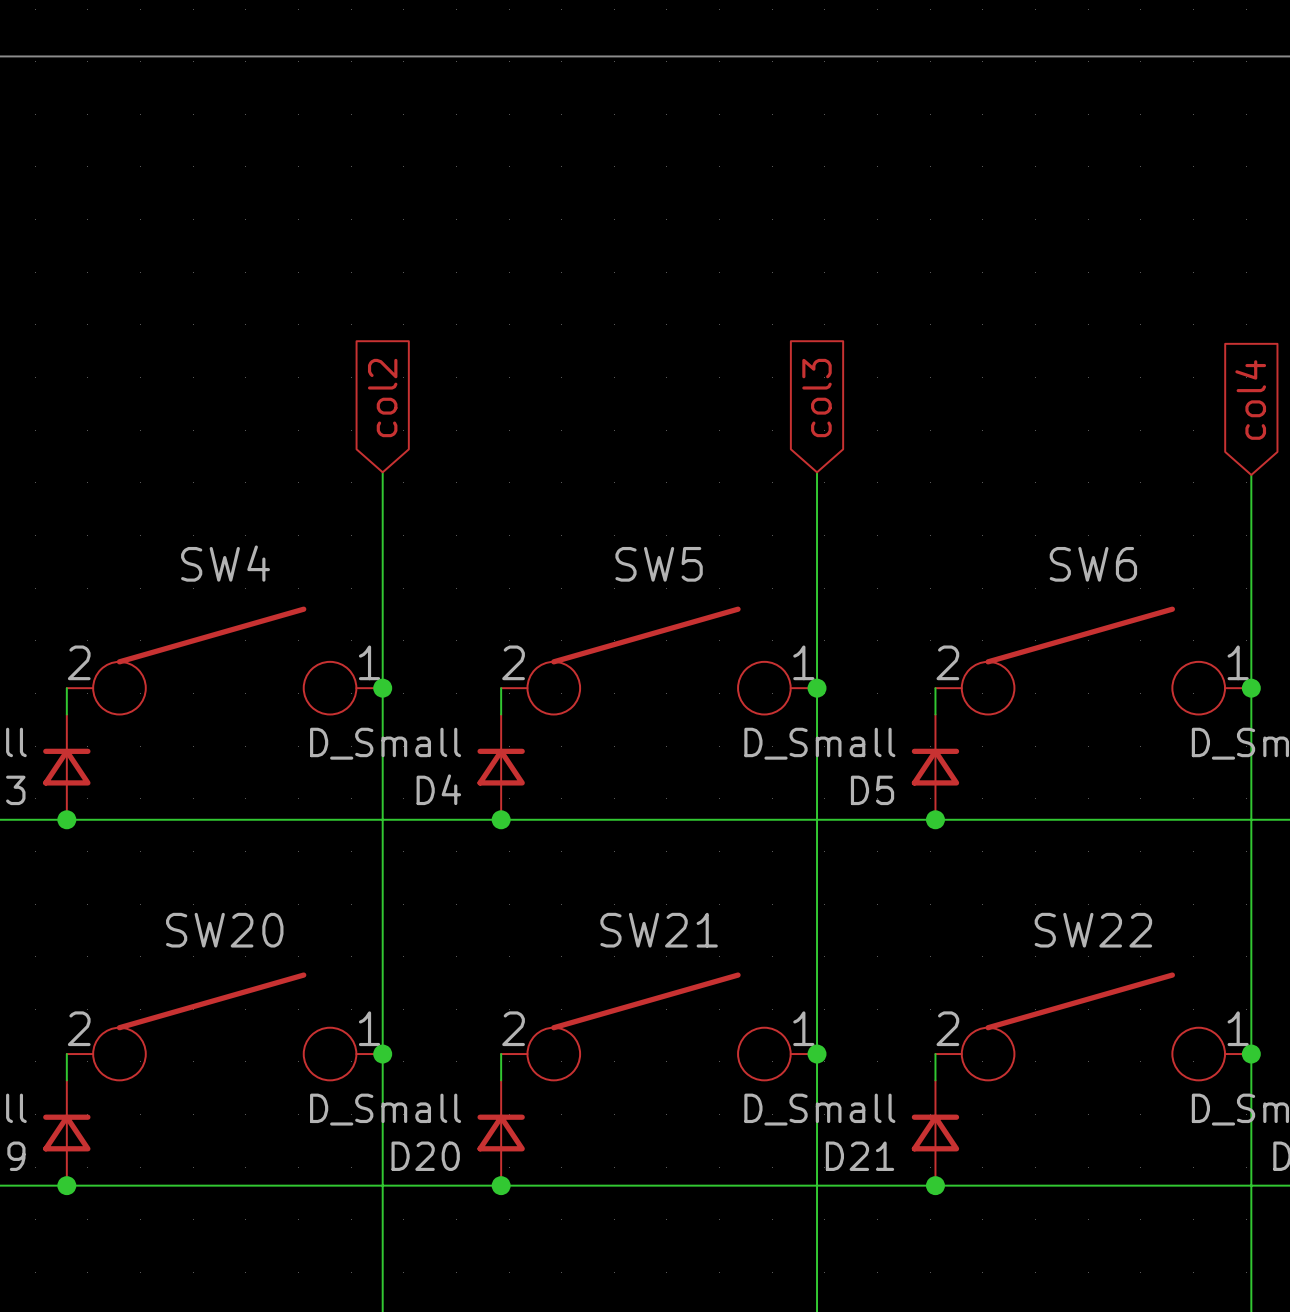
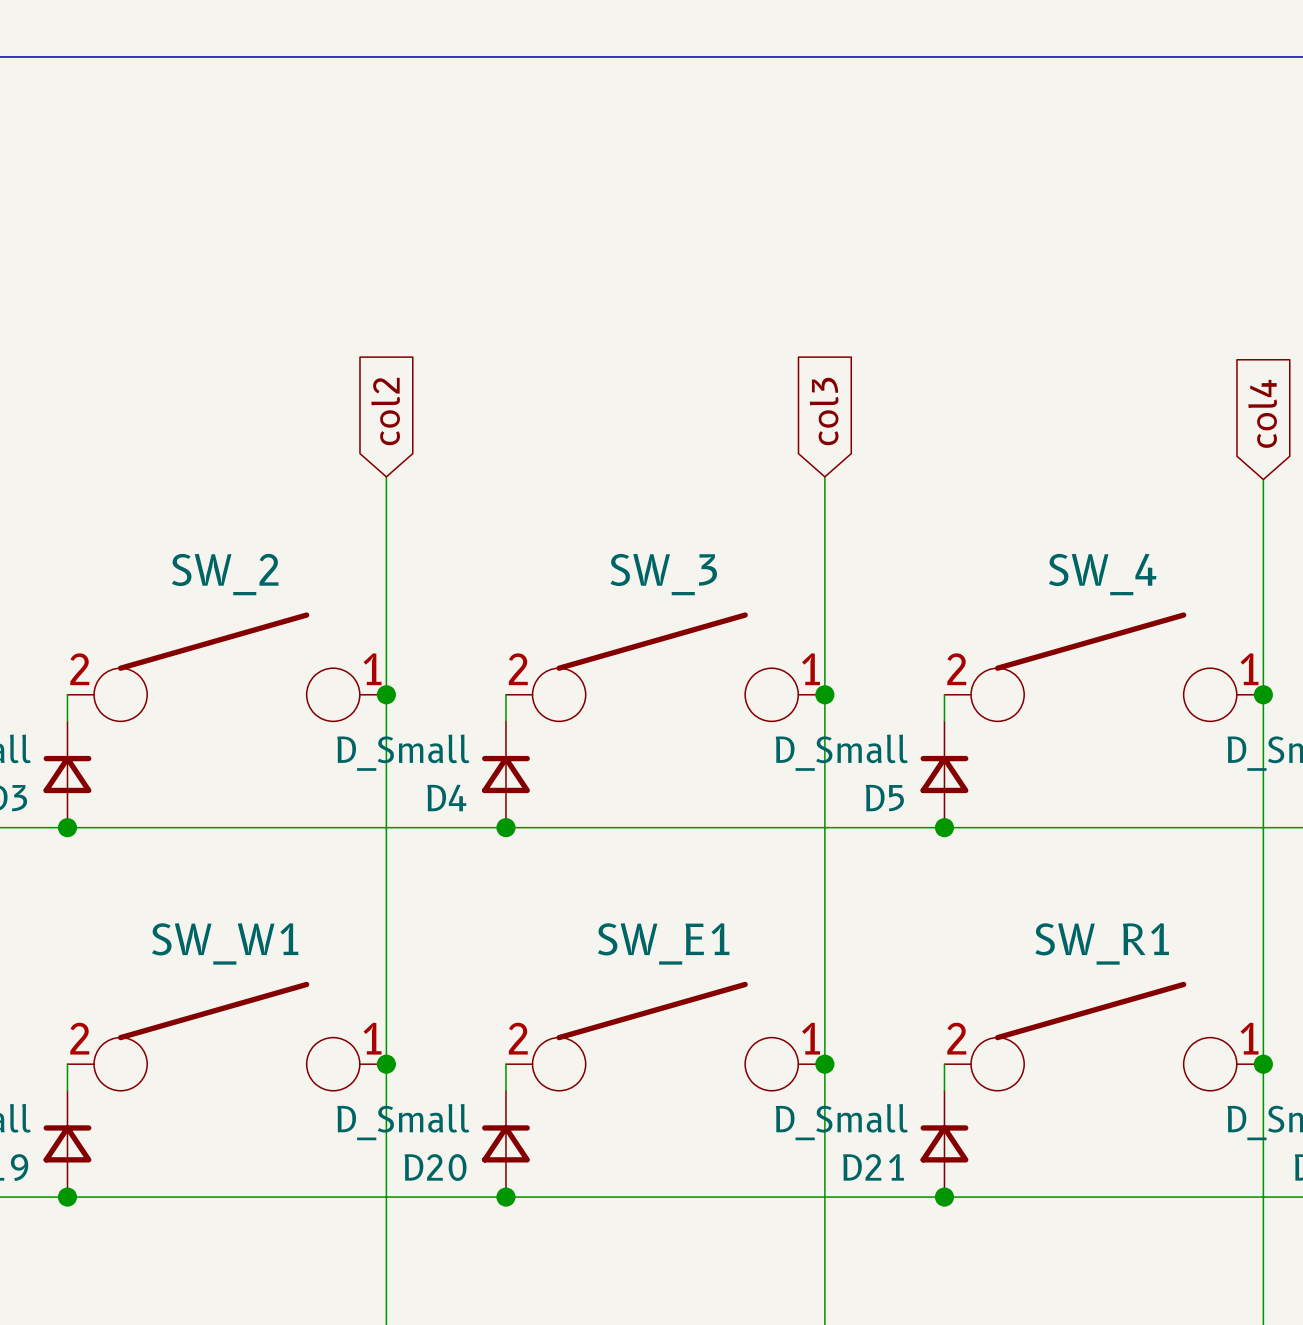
SW4 name: SW4 (225, 563) -> SW_2 (225, 574)
SW5 name: SW5 (659, 564) -> SW_3 (663, 574)
SW6 name: SW6 (1093, 564) -> SW_4 (1102, 574)
SW20 name: SW20 (224, 930) -> SW_W1 (225, 943)
SW21 name: SW21 (659, 930) -> SW_E1 (663, 943)
SW22 name: SW22 (1093, 930) -> SW_R1 (1102, 943)

